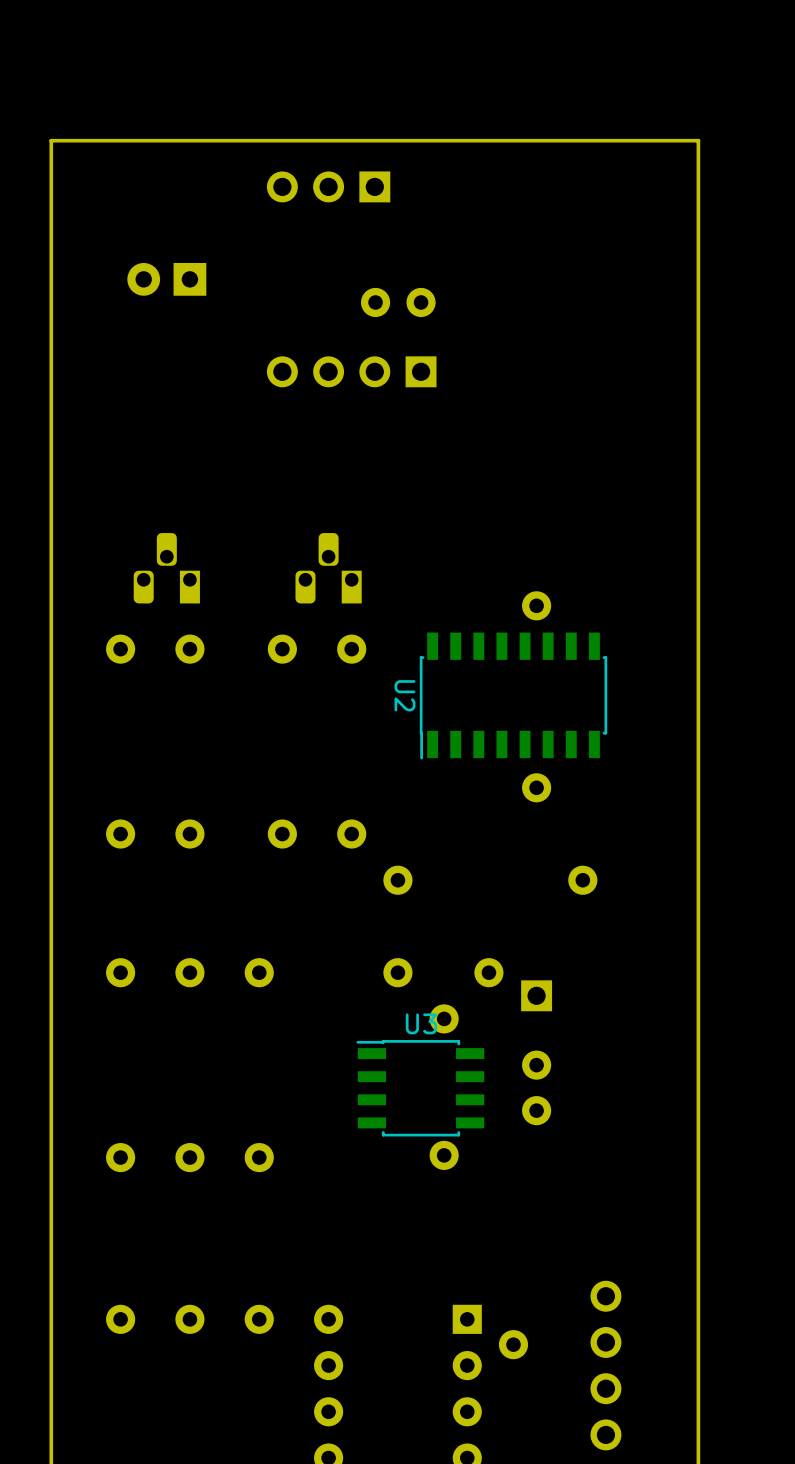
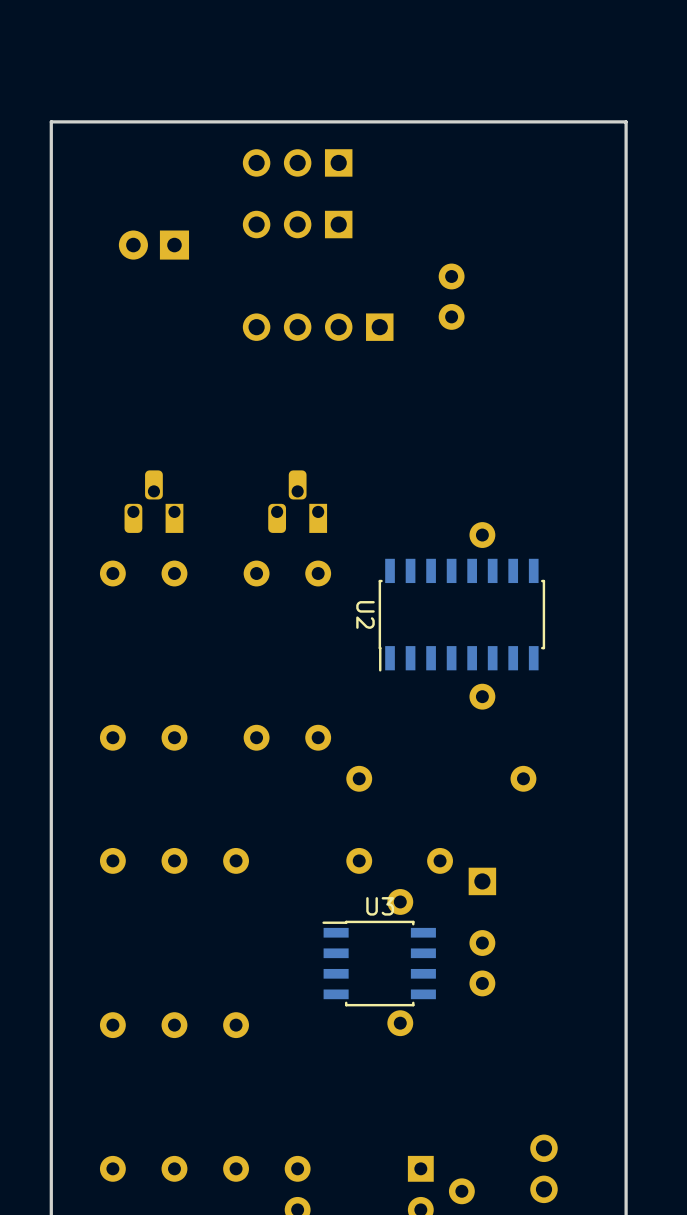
part: none -> (297, 224)
part rotation: 0° (398, 302) -> 90° clockwise (451, 296)
part position: (398, 302) -> (451, 296)

